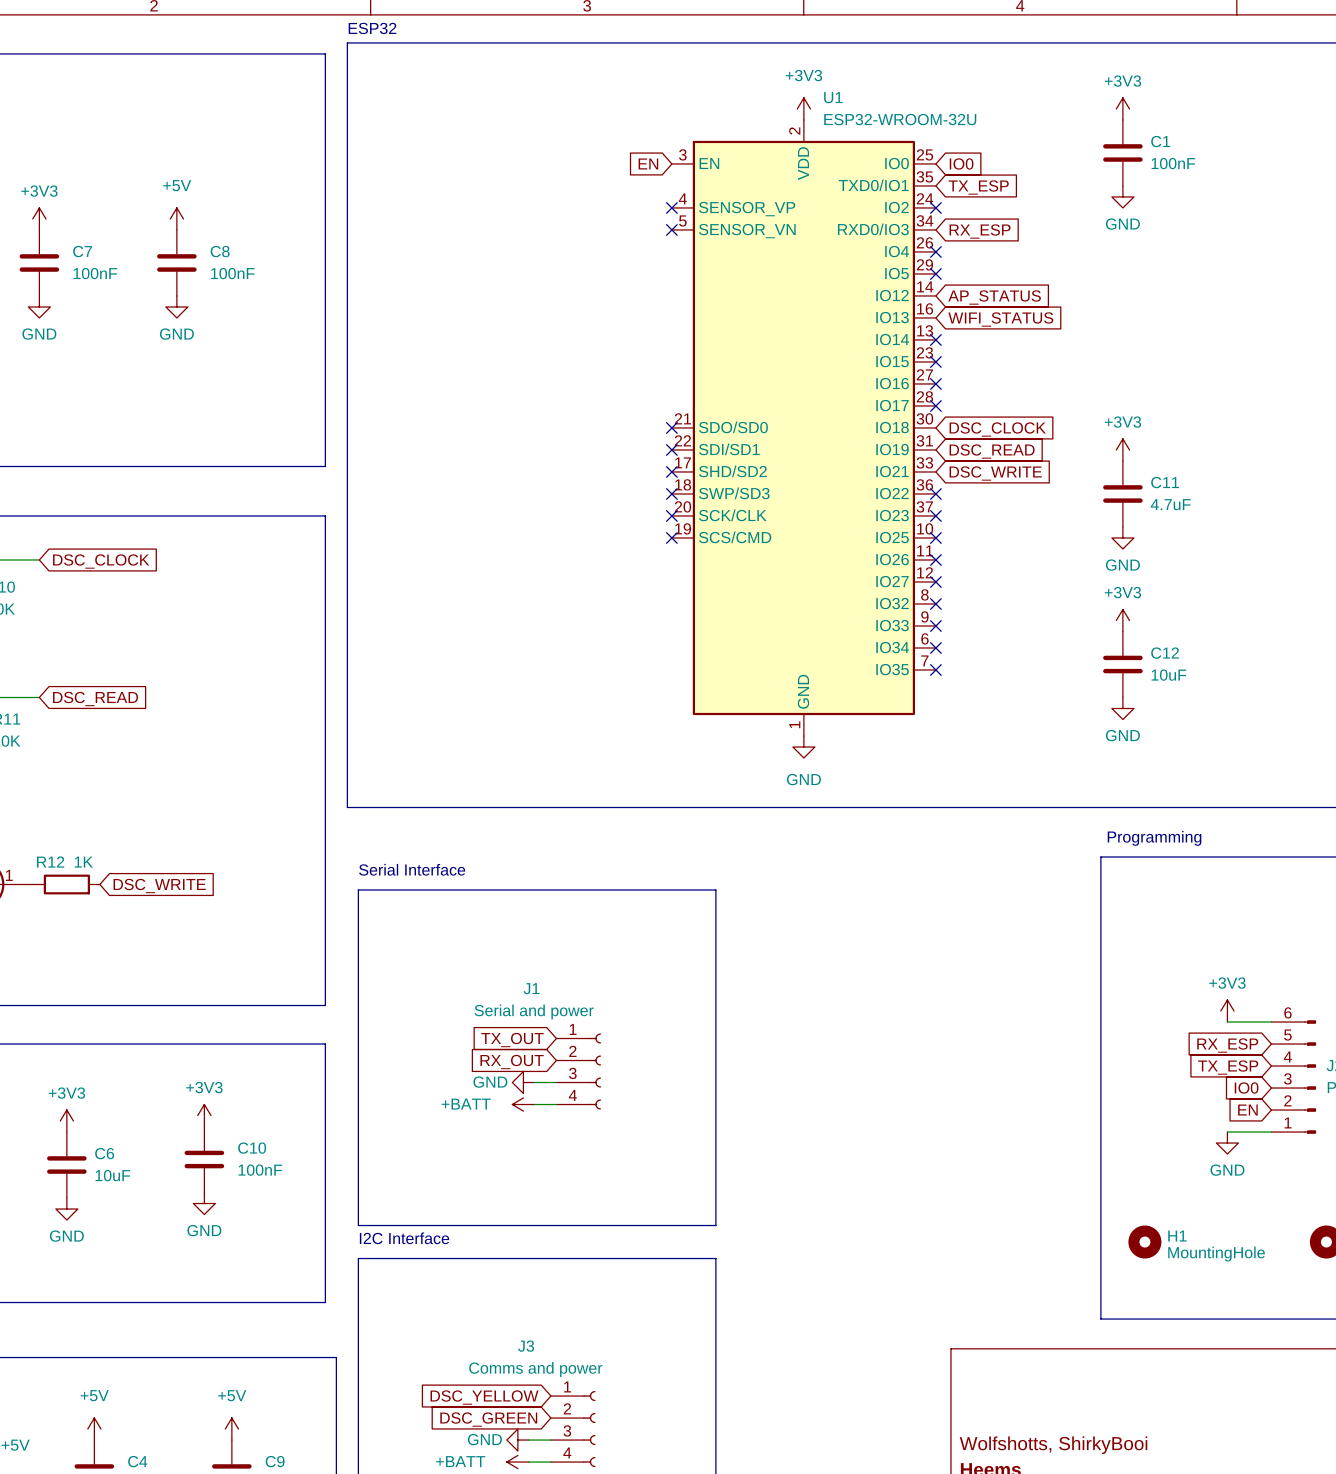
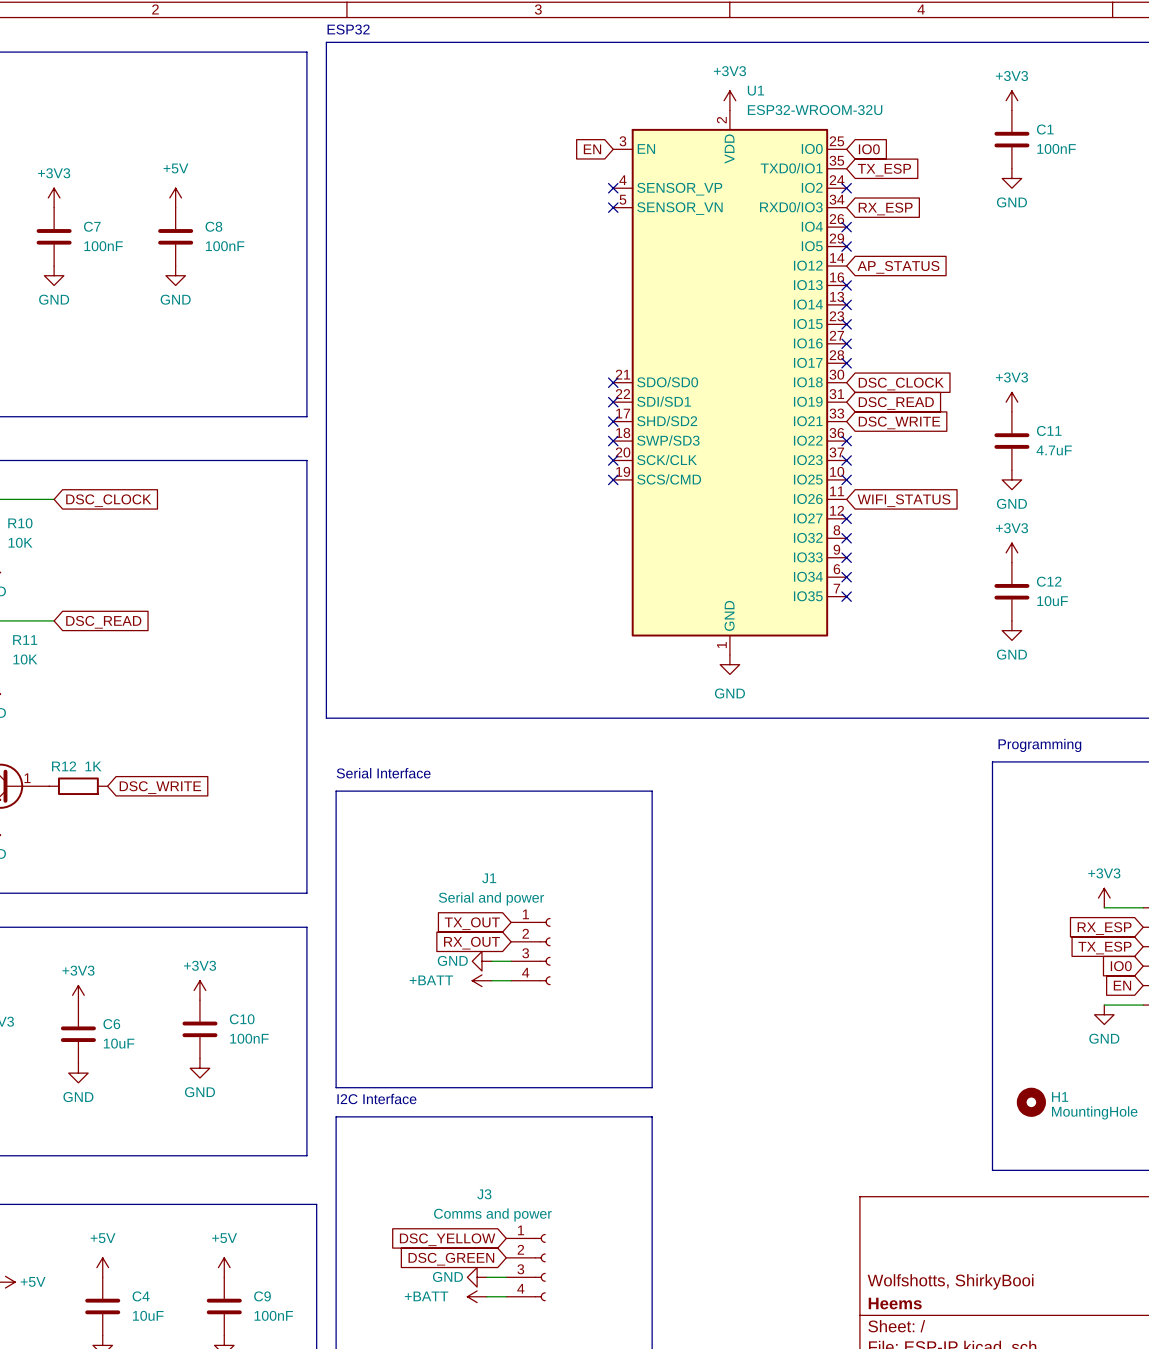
no-connect mark: none -> (846, 285)
global label: WIFI_STATUS (1000, 319) -> none
no-connect mark: (935, 559) -> none
global label: none -> WIFI_STATUS (903, 500)

